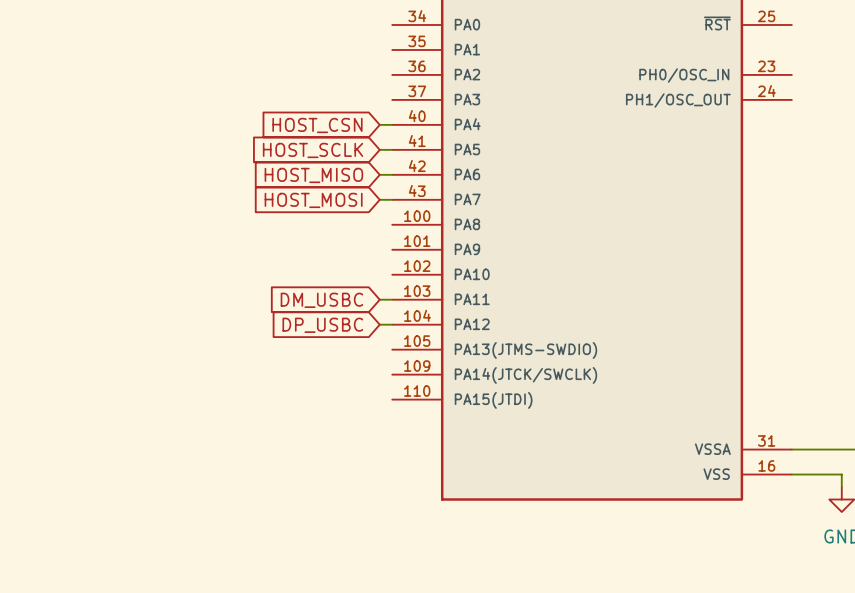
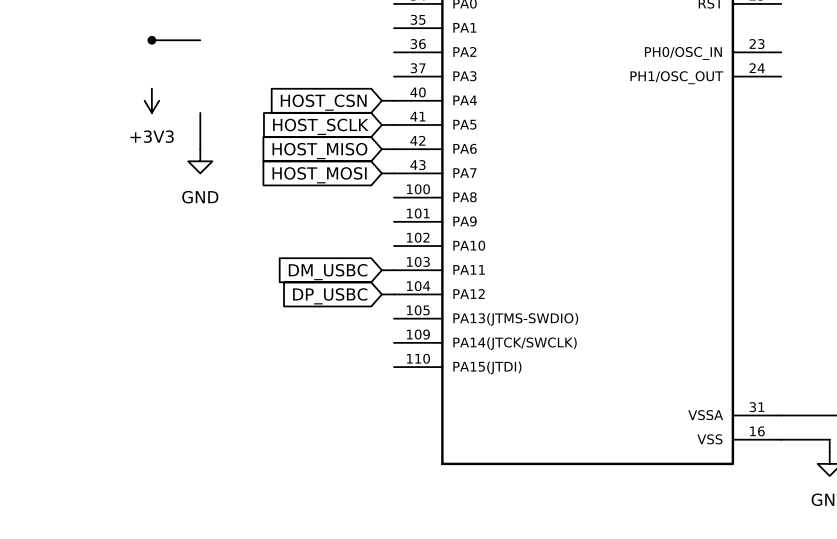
wire: none -> (151, 40) (200, 40)
junction: none -> (151, 40)
power symbol: none -> +3V3 (151, 100)
wire: none -> (200, 112) (200, 149)
power symbol: none -> GND (200, 161)

